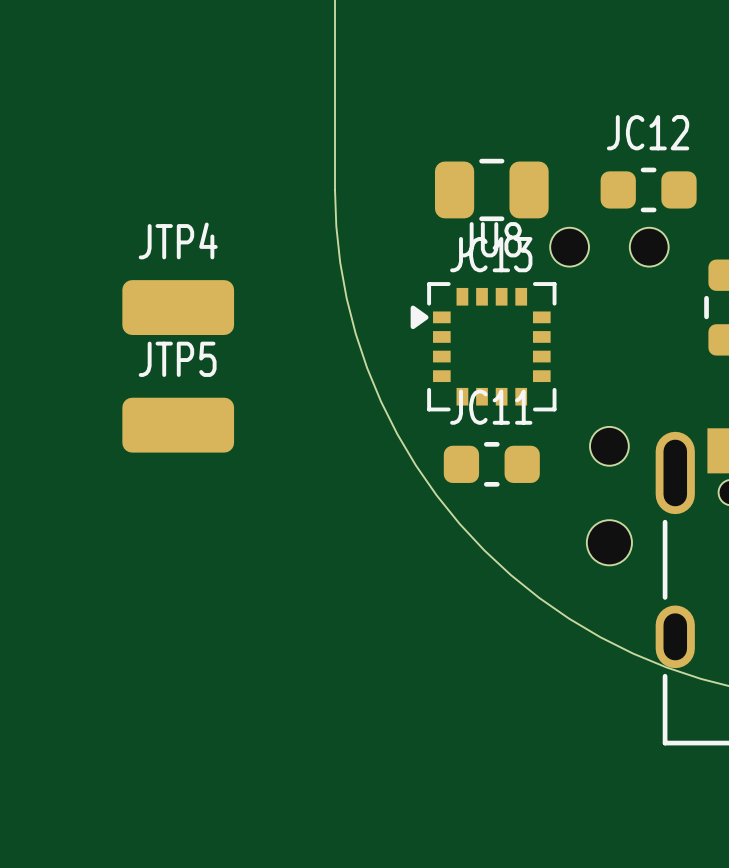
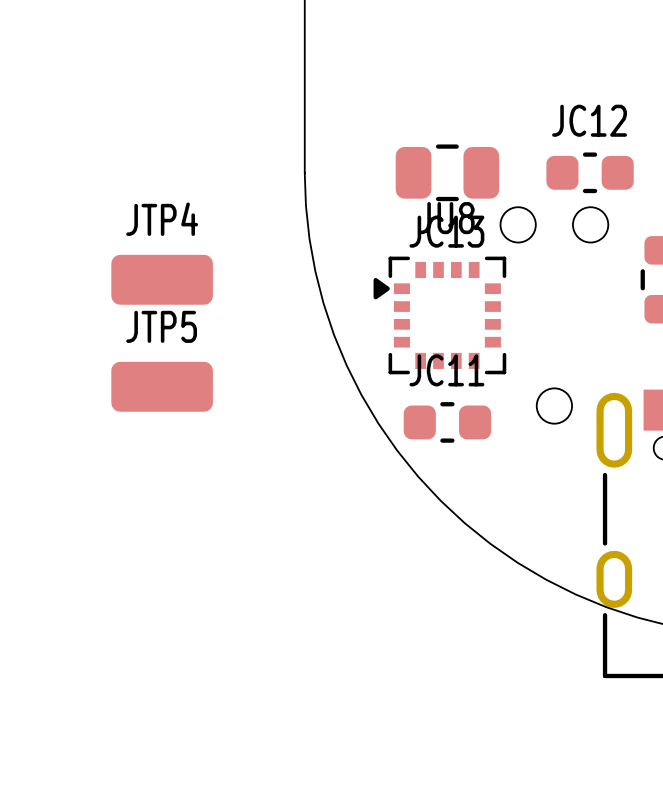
part: (609, 542) -> none

